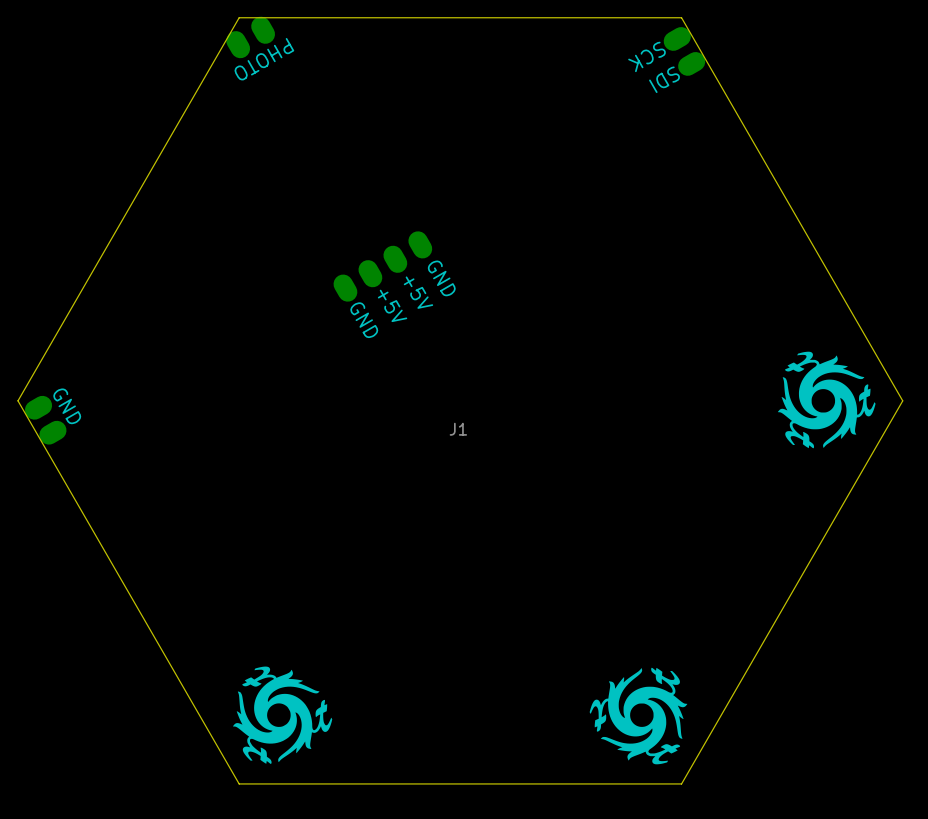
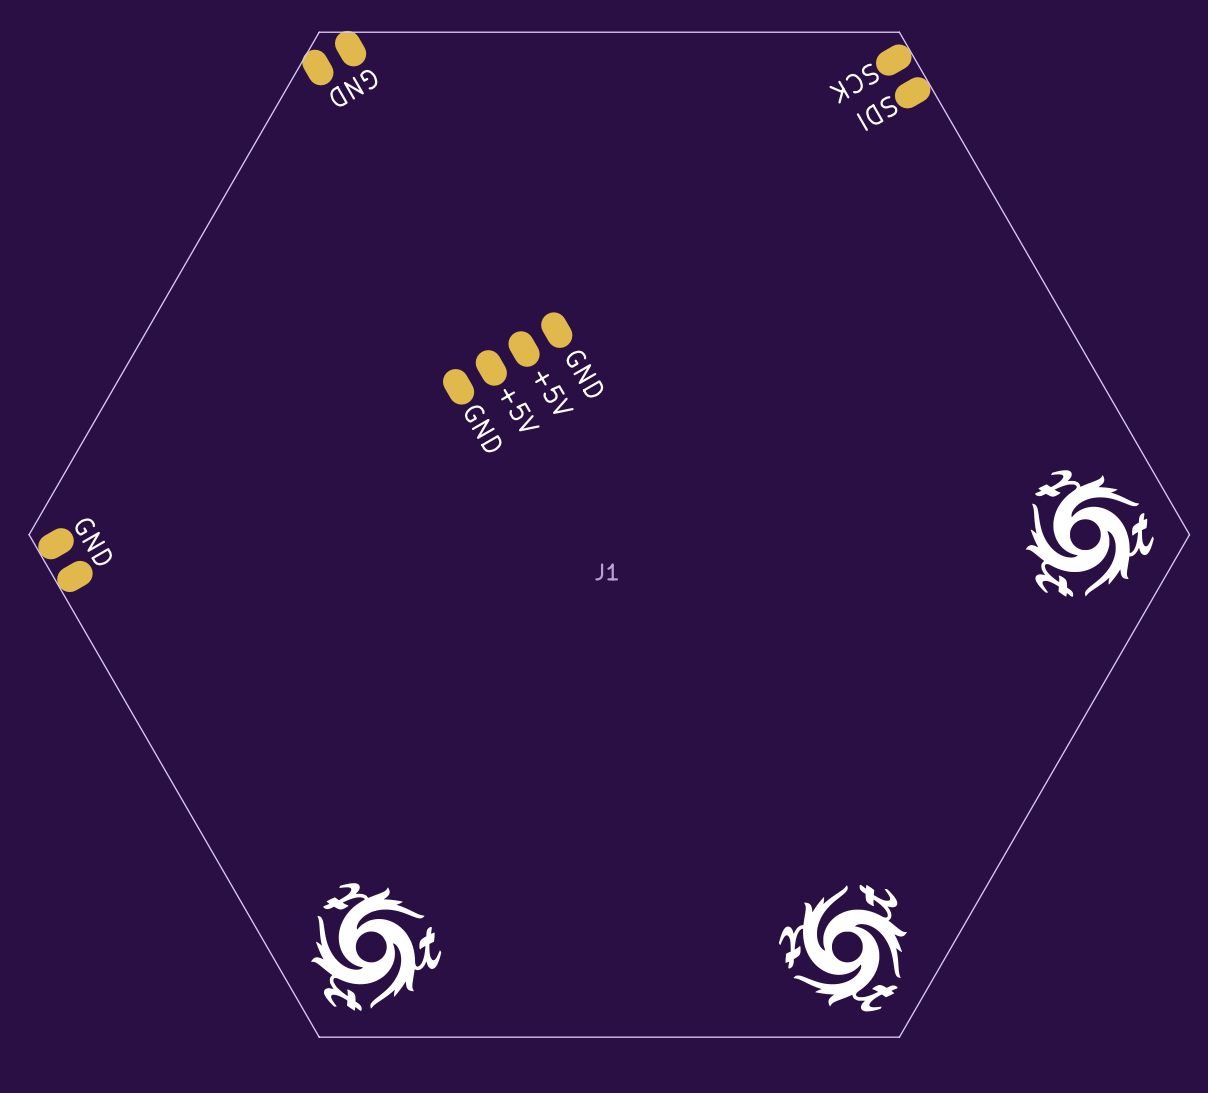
text: PHOTO (264, 59) -> none
text: none -> GND (353, 88)

